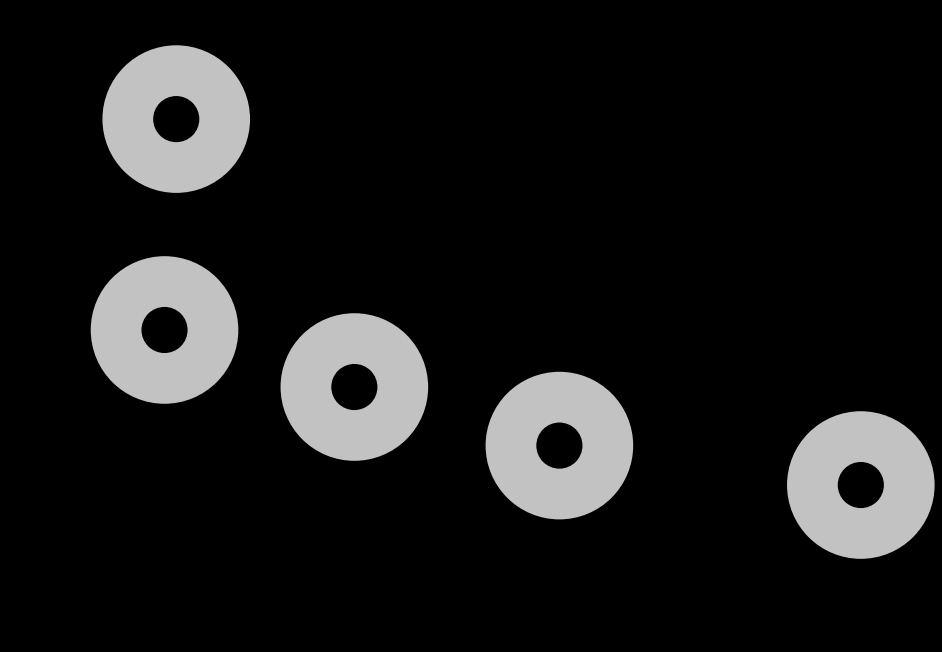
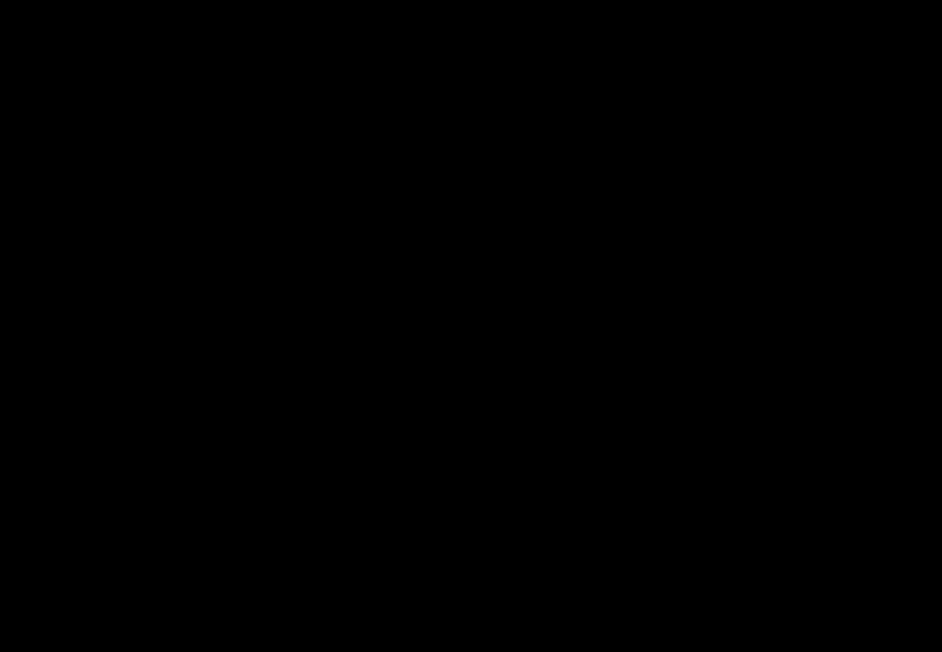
via: (176, 119) -> none
via: (164, 329) -> none
via: (354, 387) -> none
via: (559, 445) -> none
via: (860, 485) -> none

